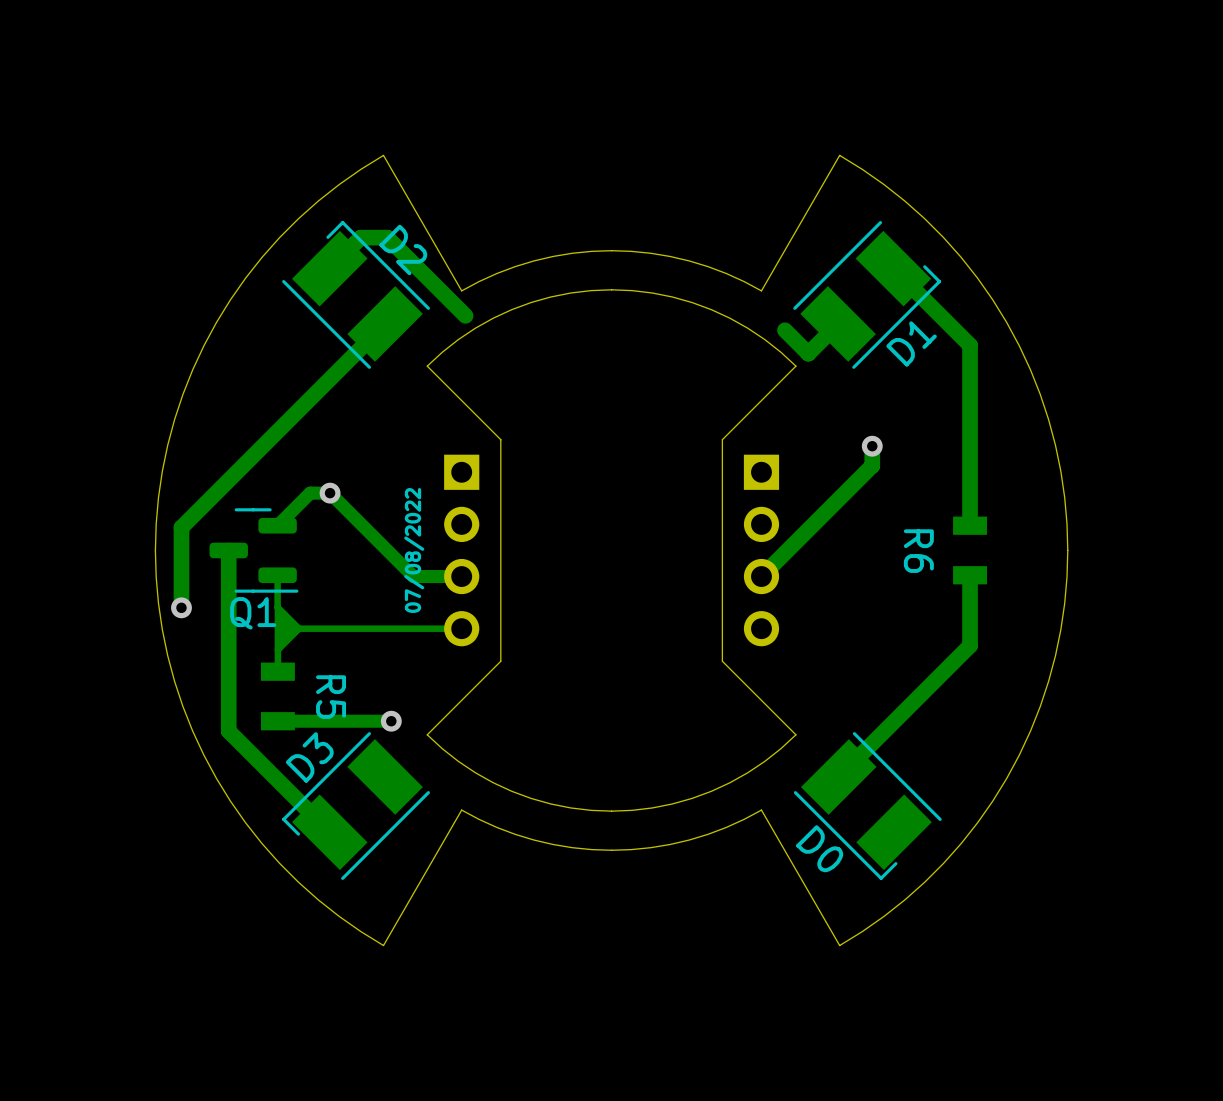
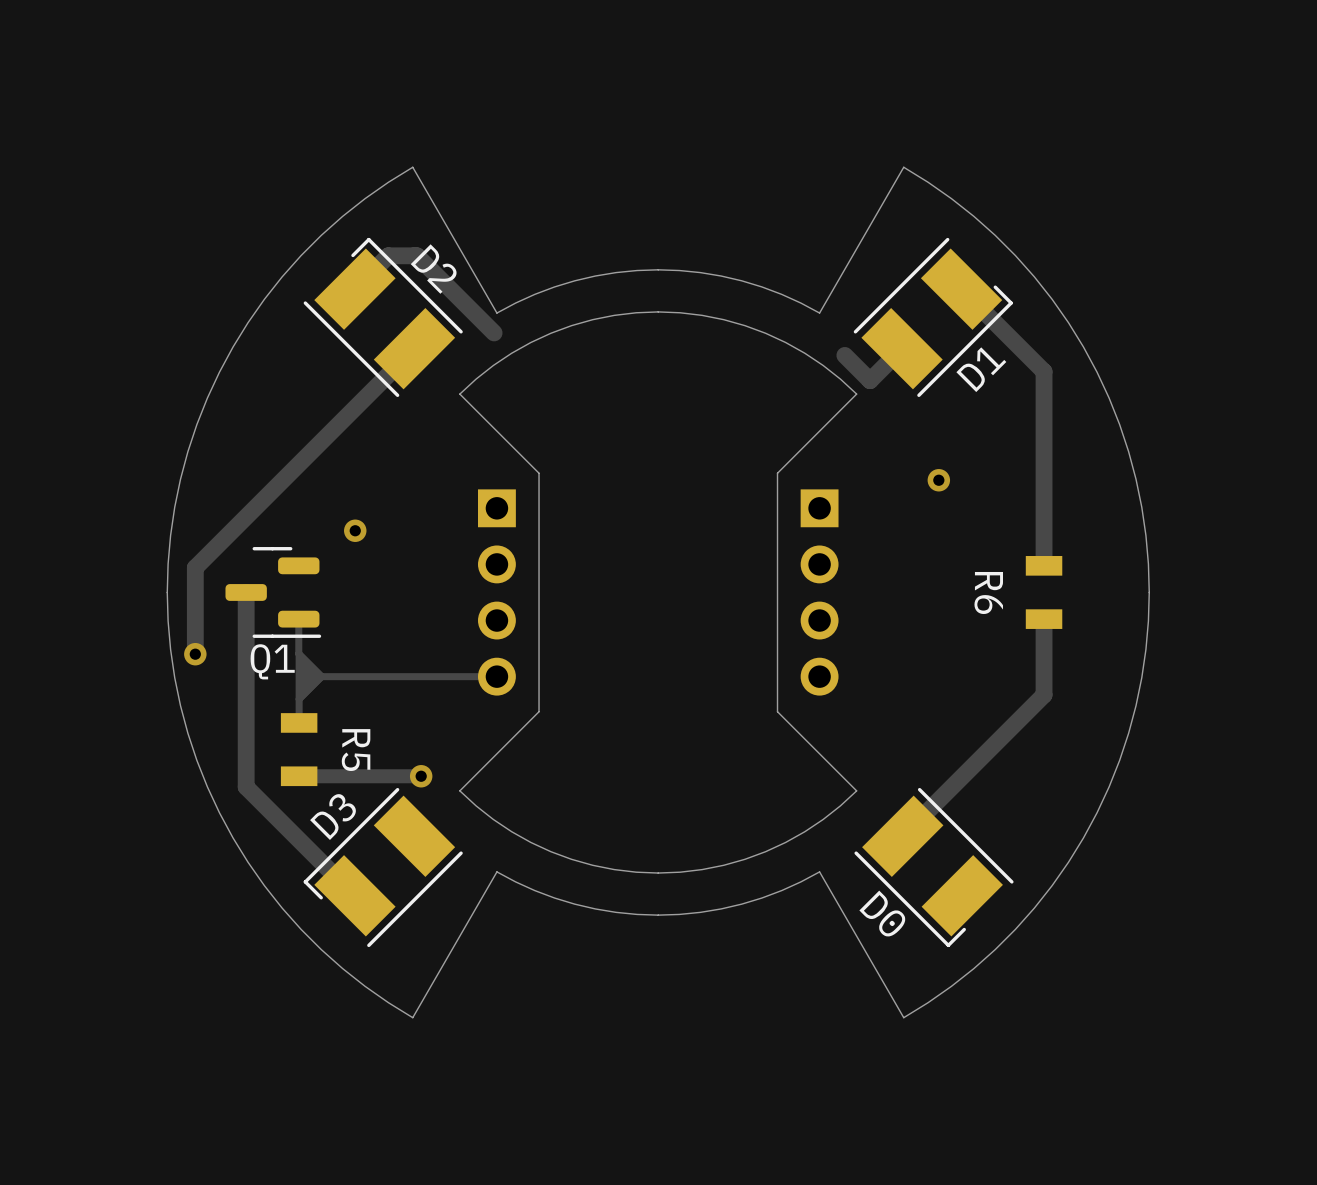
track: (459, 309) (465, 315) -> none
track: (872, 446) (872, 465) (761, 576) -> none
track: (277, 525) (310, 493) (330, 493) (413, 576) (461, 576) -> none
text: 07/08/2022 (414, 550) -> none

